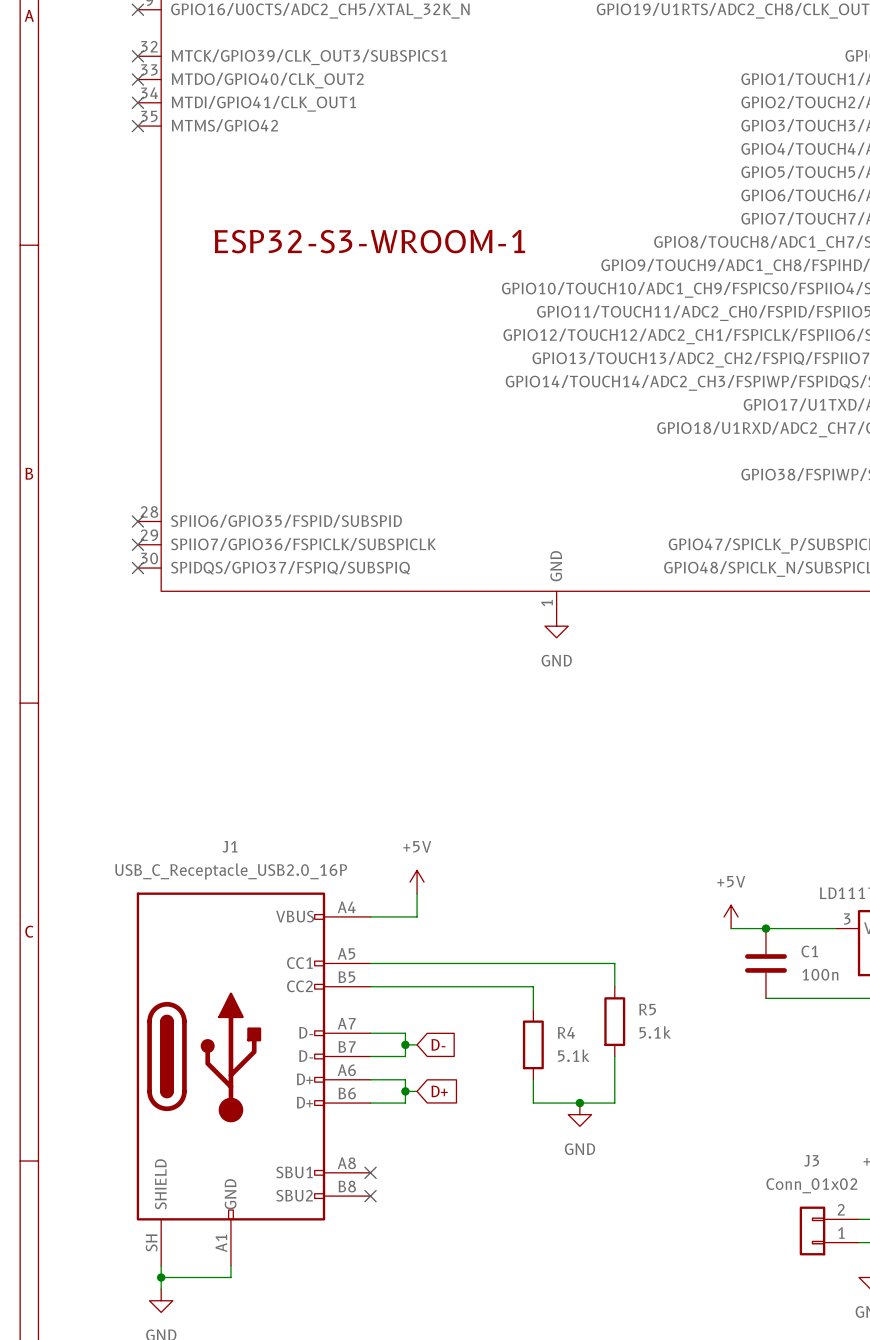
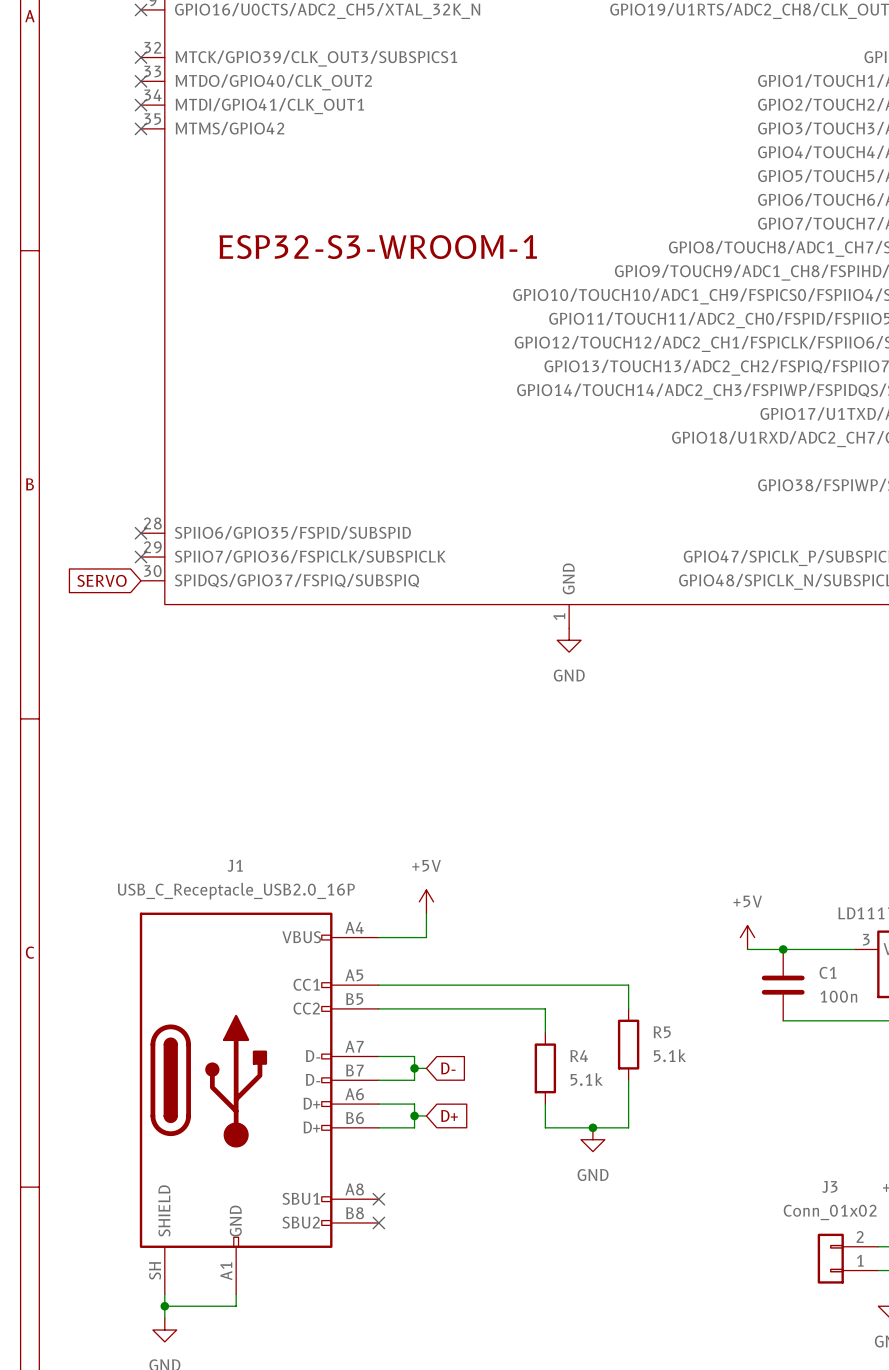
global label: none -> SERVO (102, 580)
no-connect mark: (137, 568) -> none

